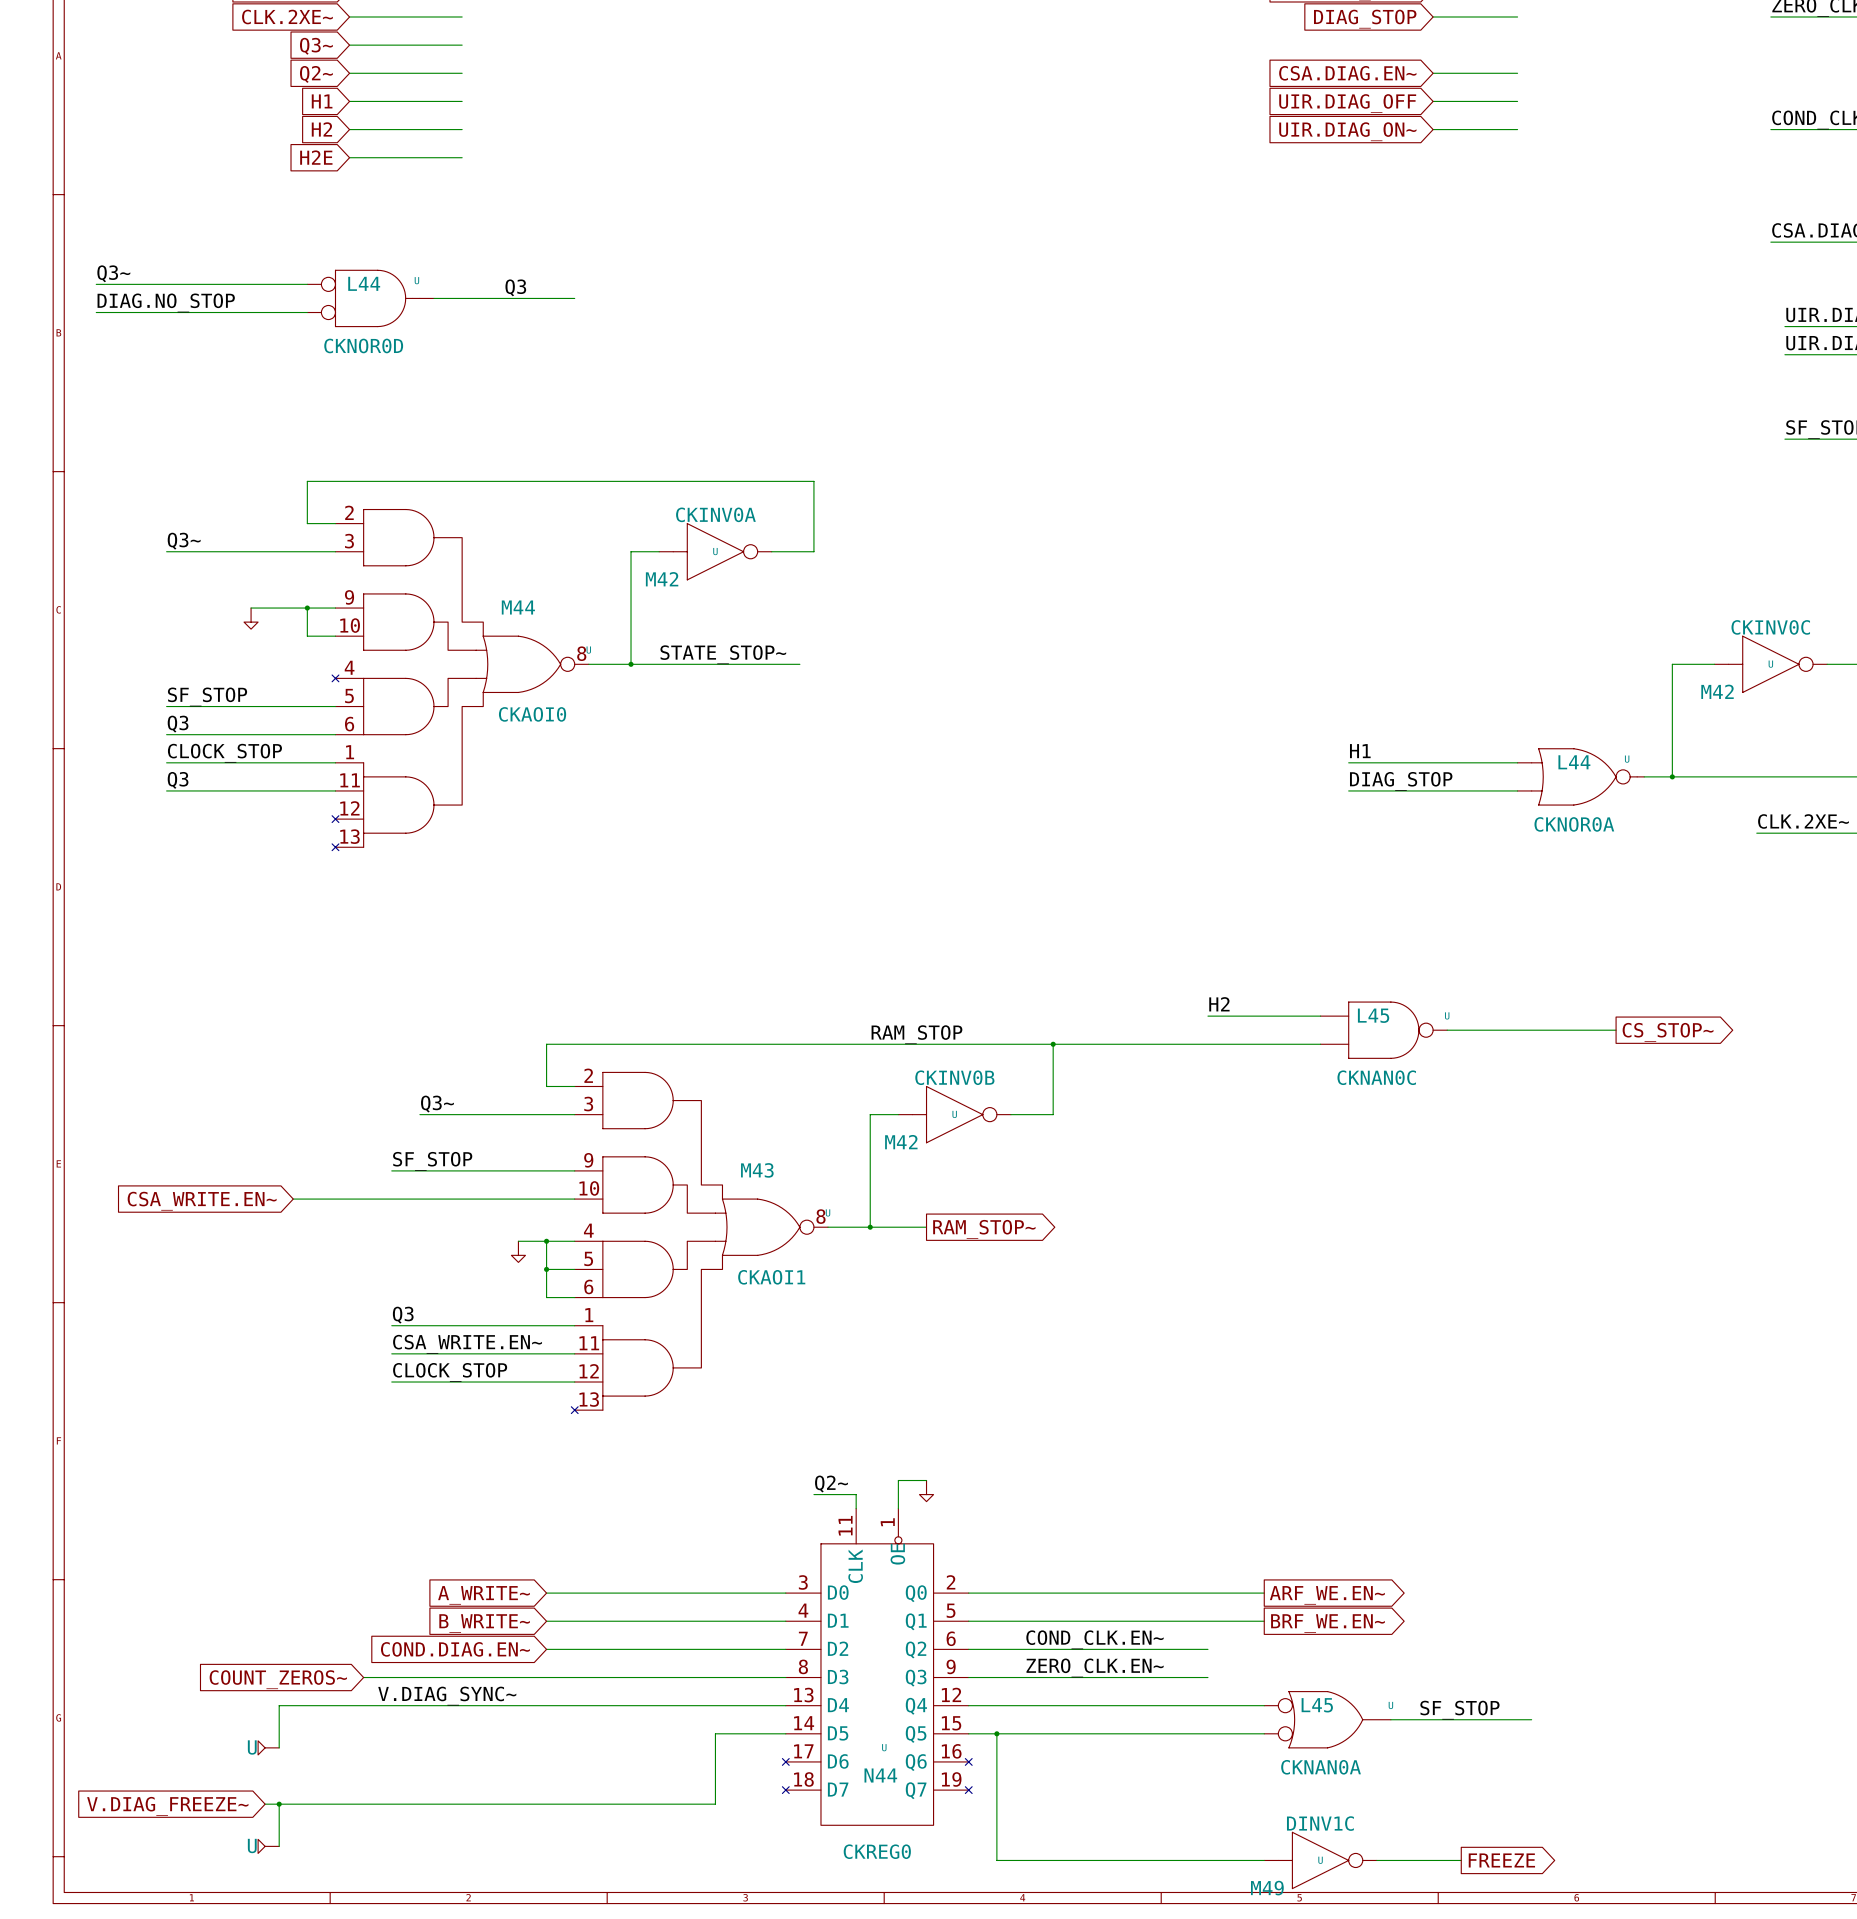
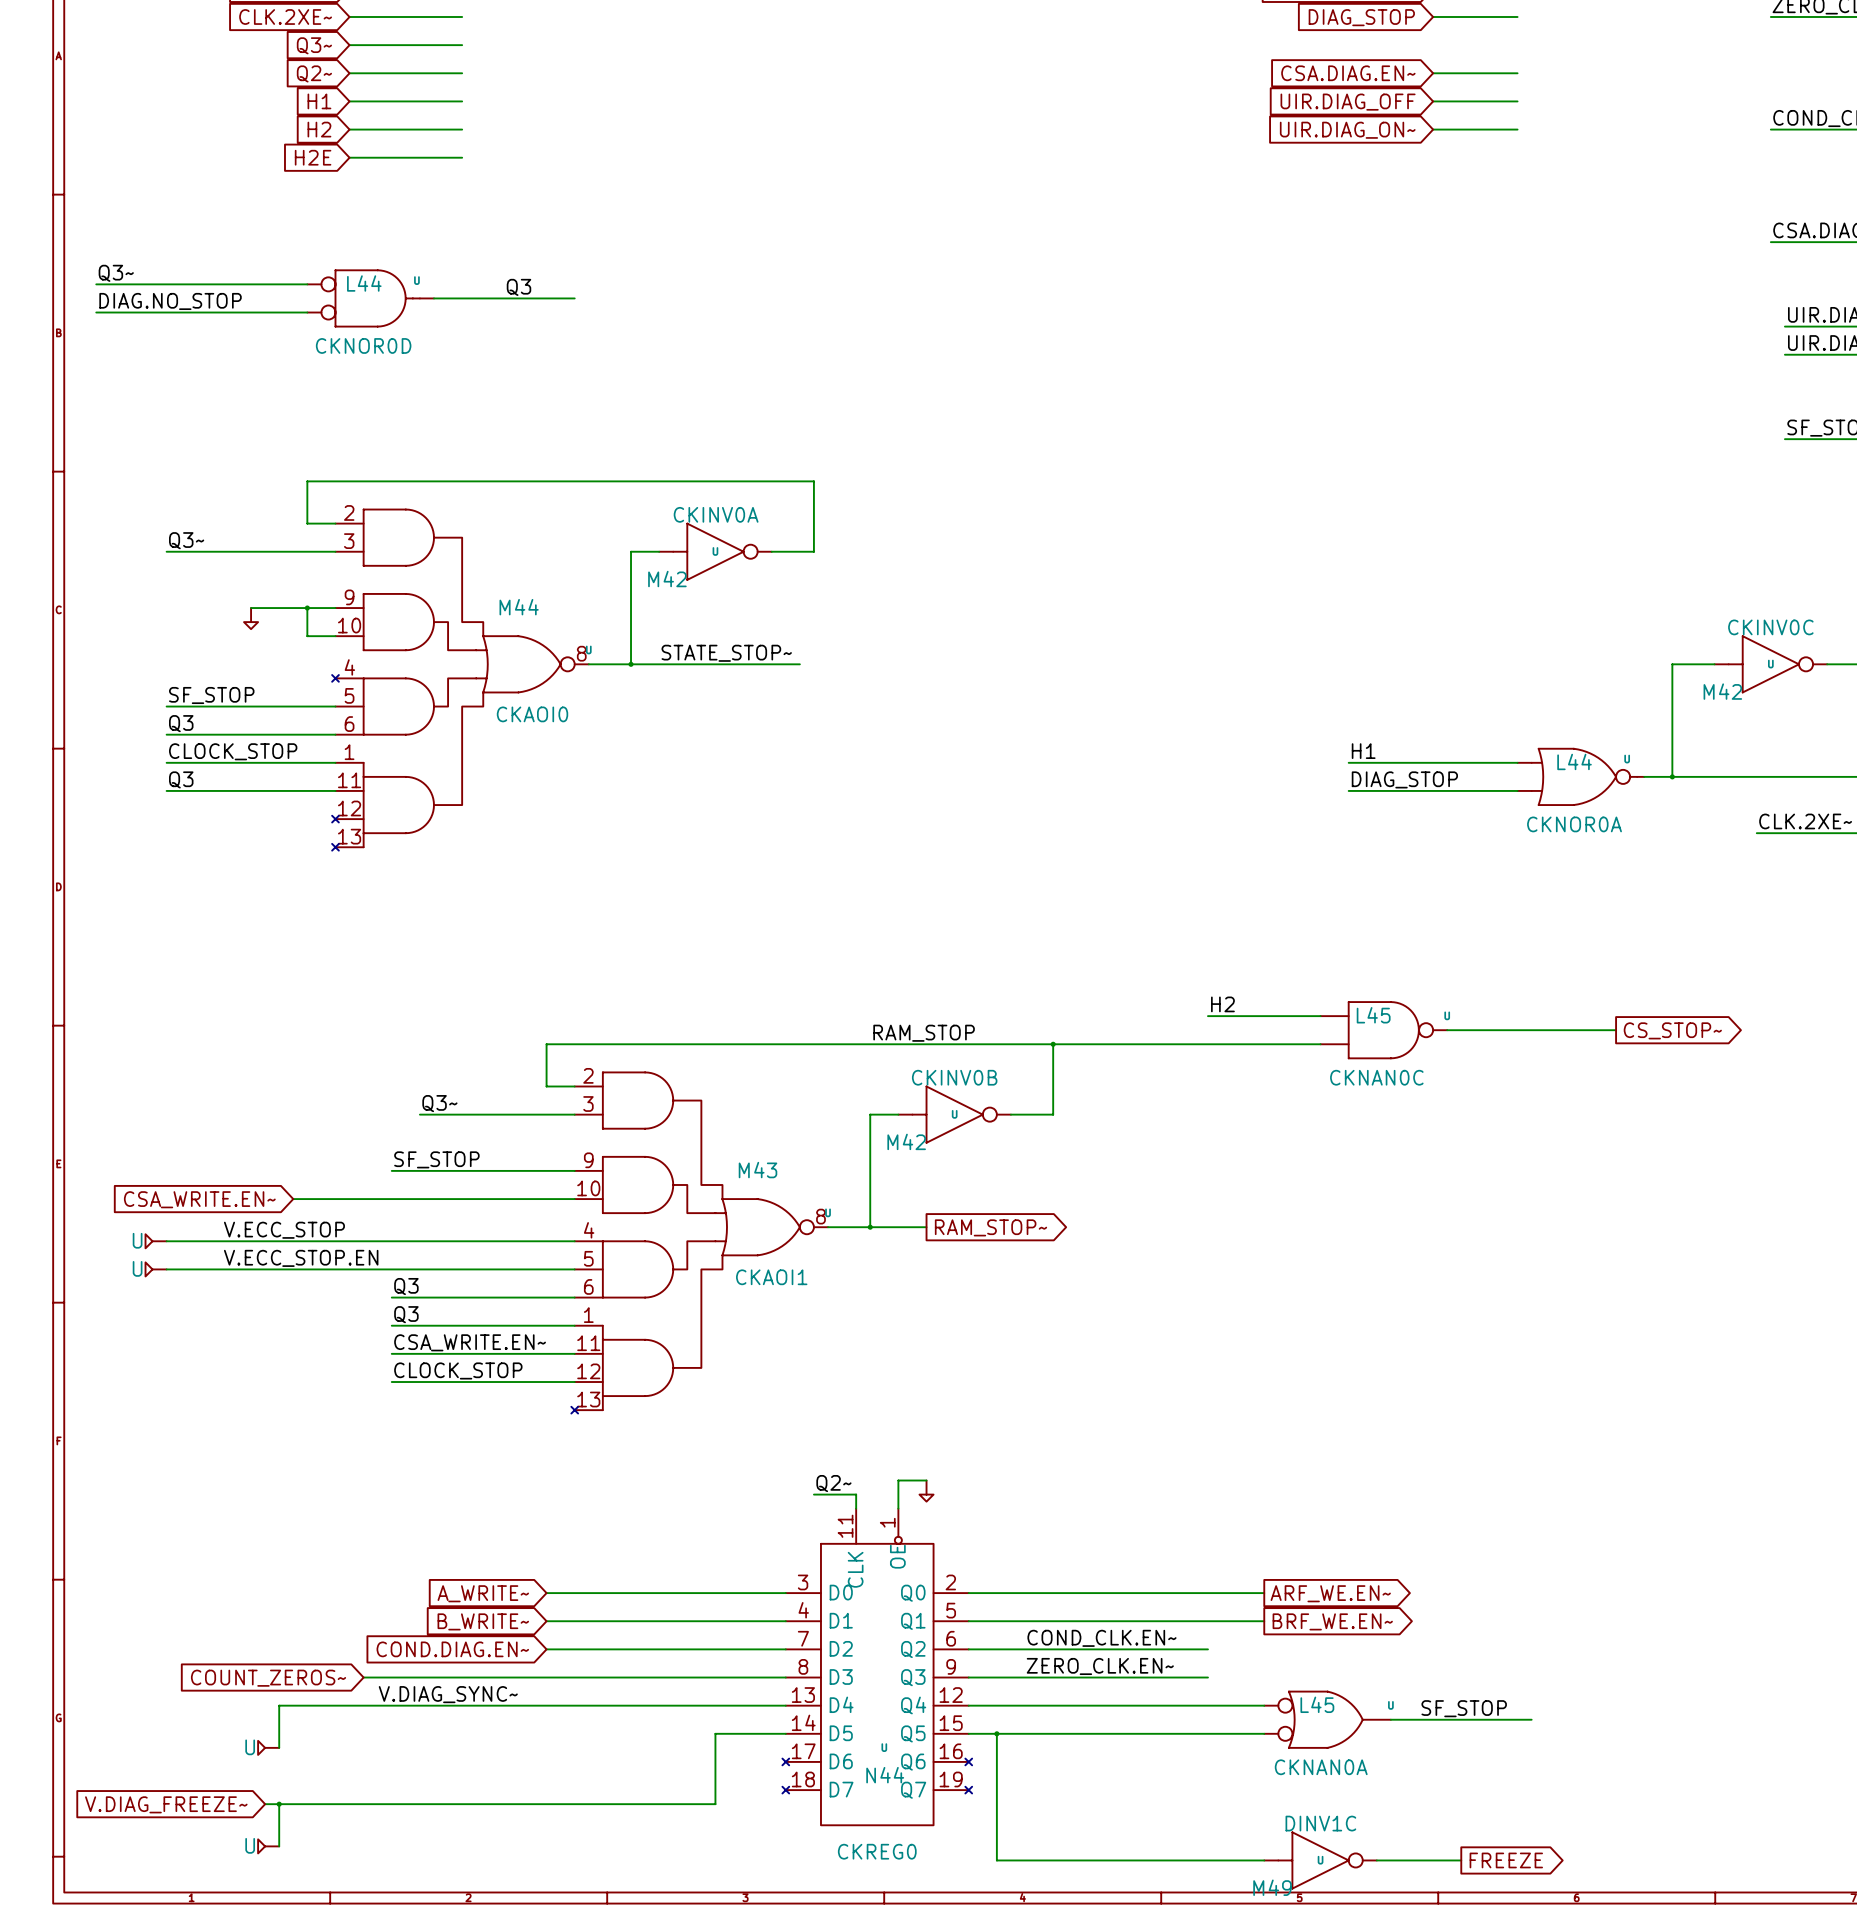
label: none -> V.ECC_STOP (284, 1230)
U: none -> (155, 1241)
wire: none -> (166, 1241) (518, 1241)
wire: (546, 1241) (546, 1297) -> (391, 1297) (546, 1297)
junction: (546, 1241) -> none
power symbol: (518, 1252) -> none
label: none -> V.ECC_STOP.EN (301, 1258)
U: none -> (155, 1269)
wire: none -> (166, 1269) (546, 1269)
junction: (546, 1269) -> none
label: none -> Q3 (406, 1286)

